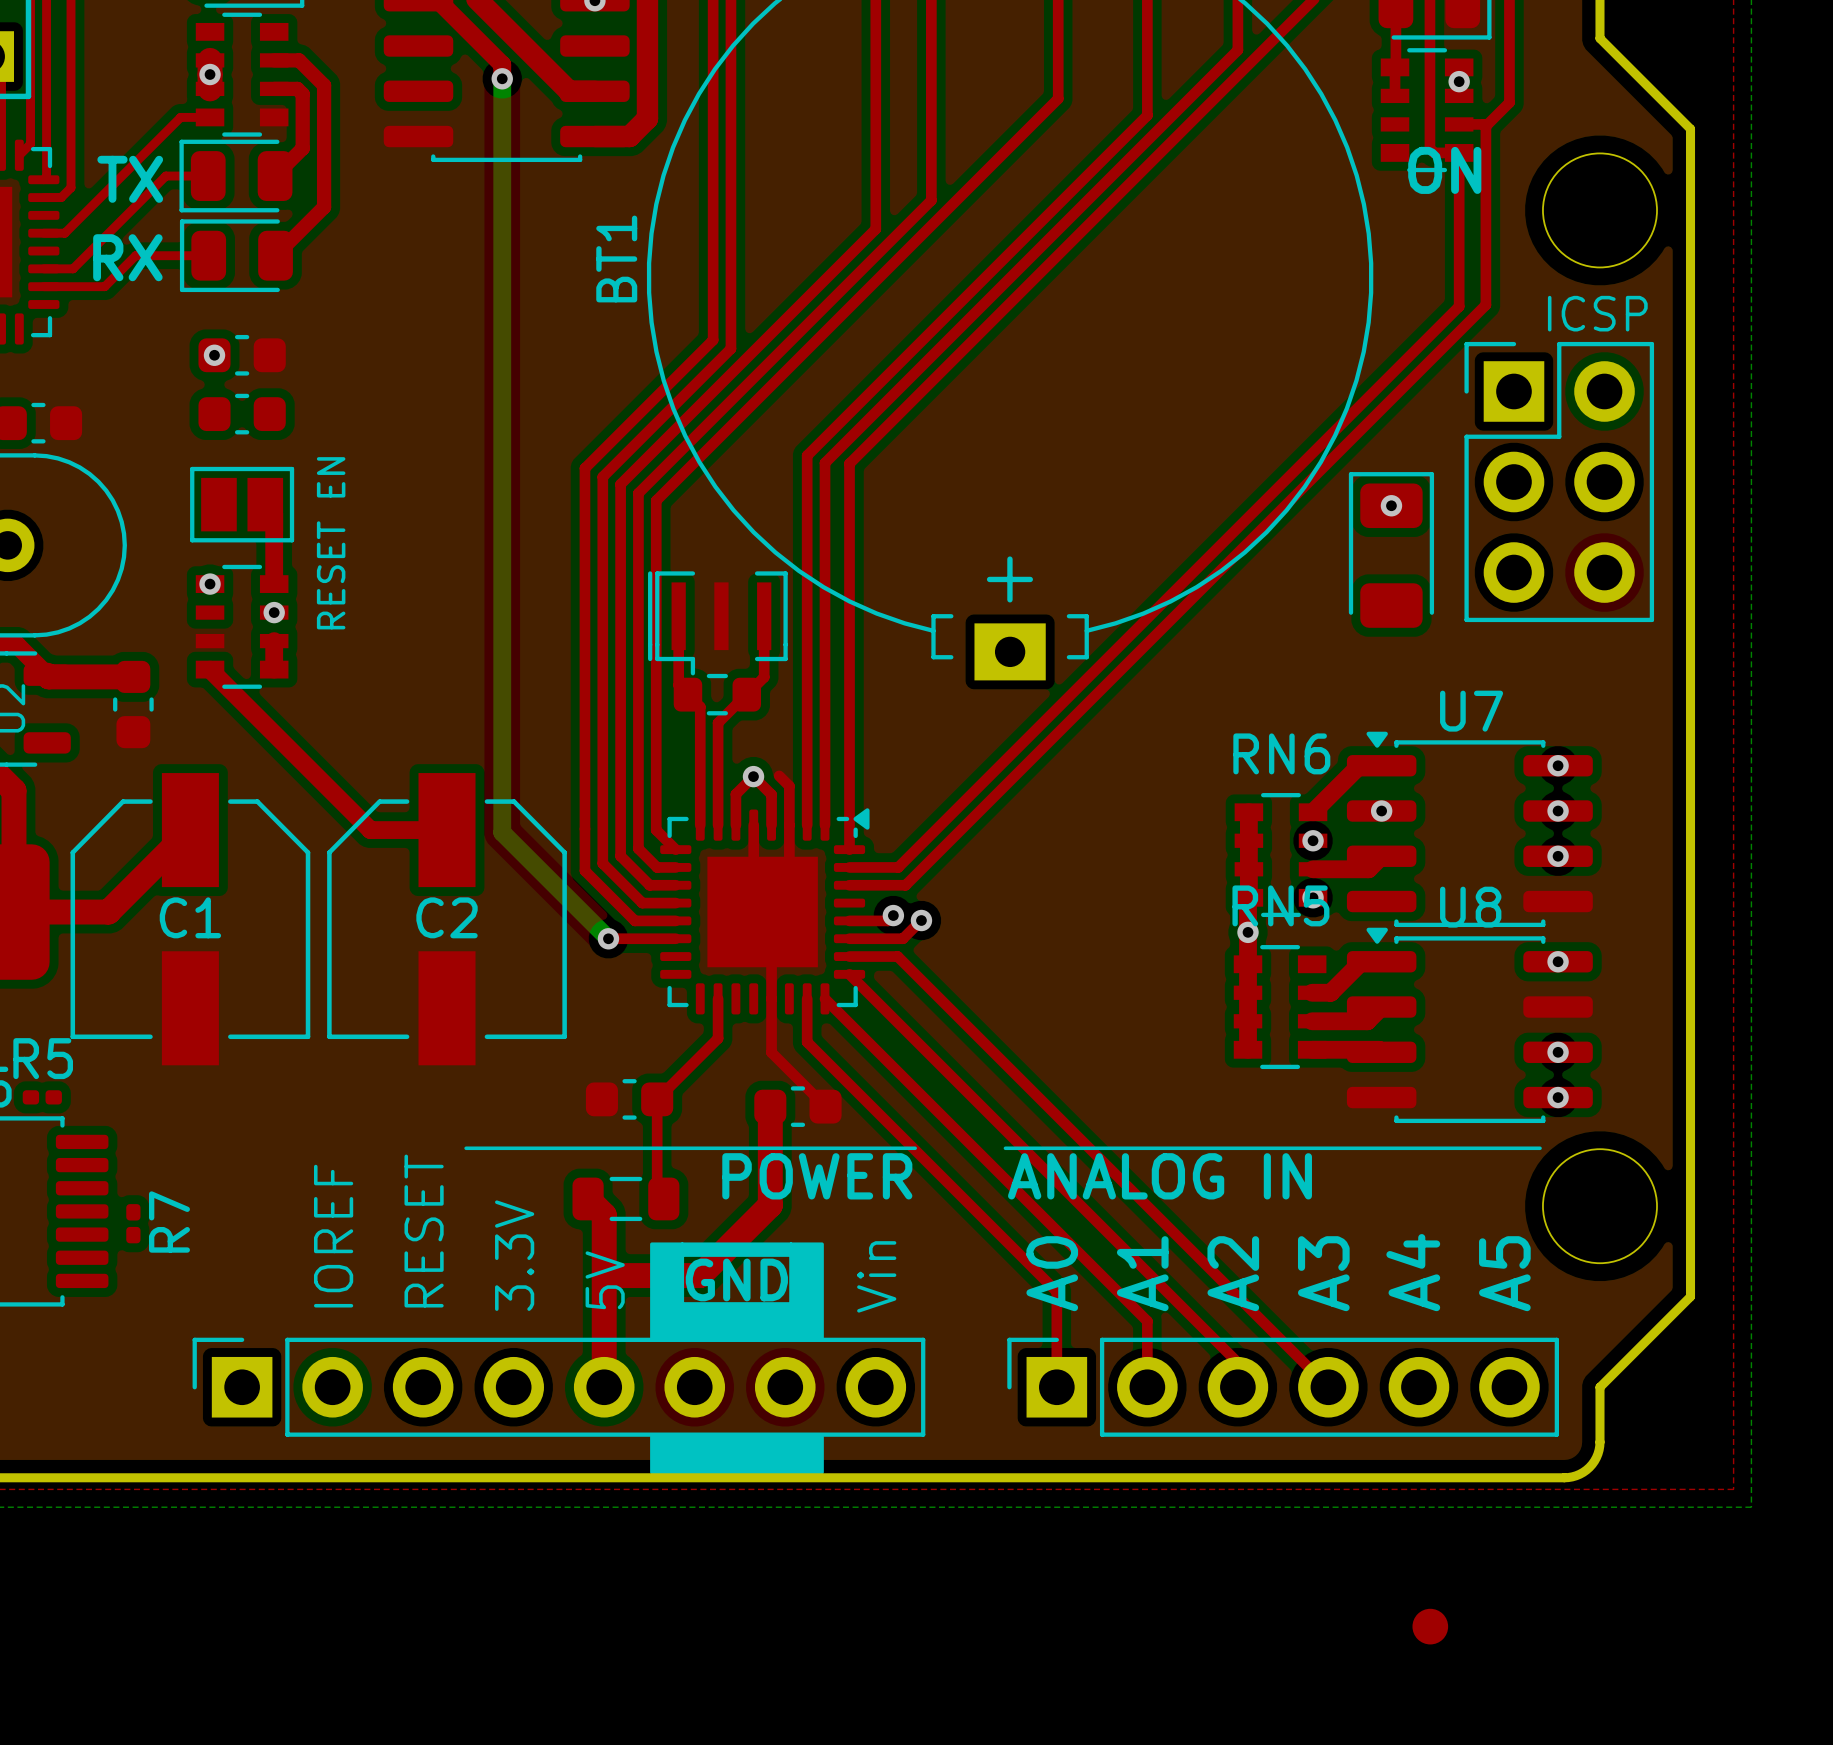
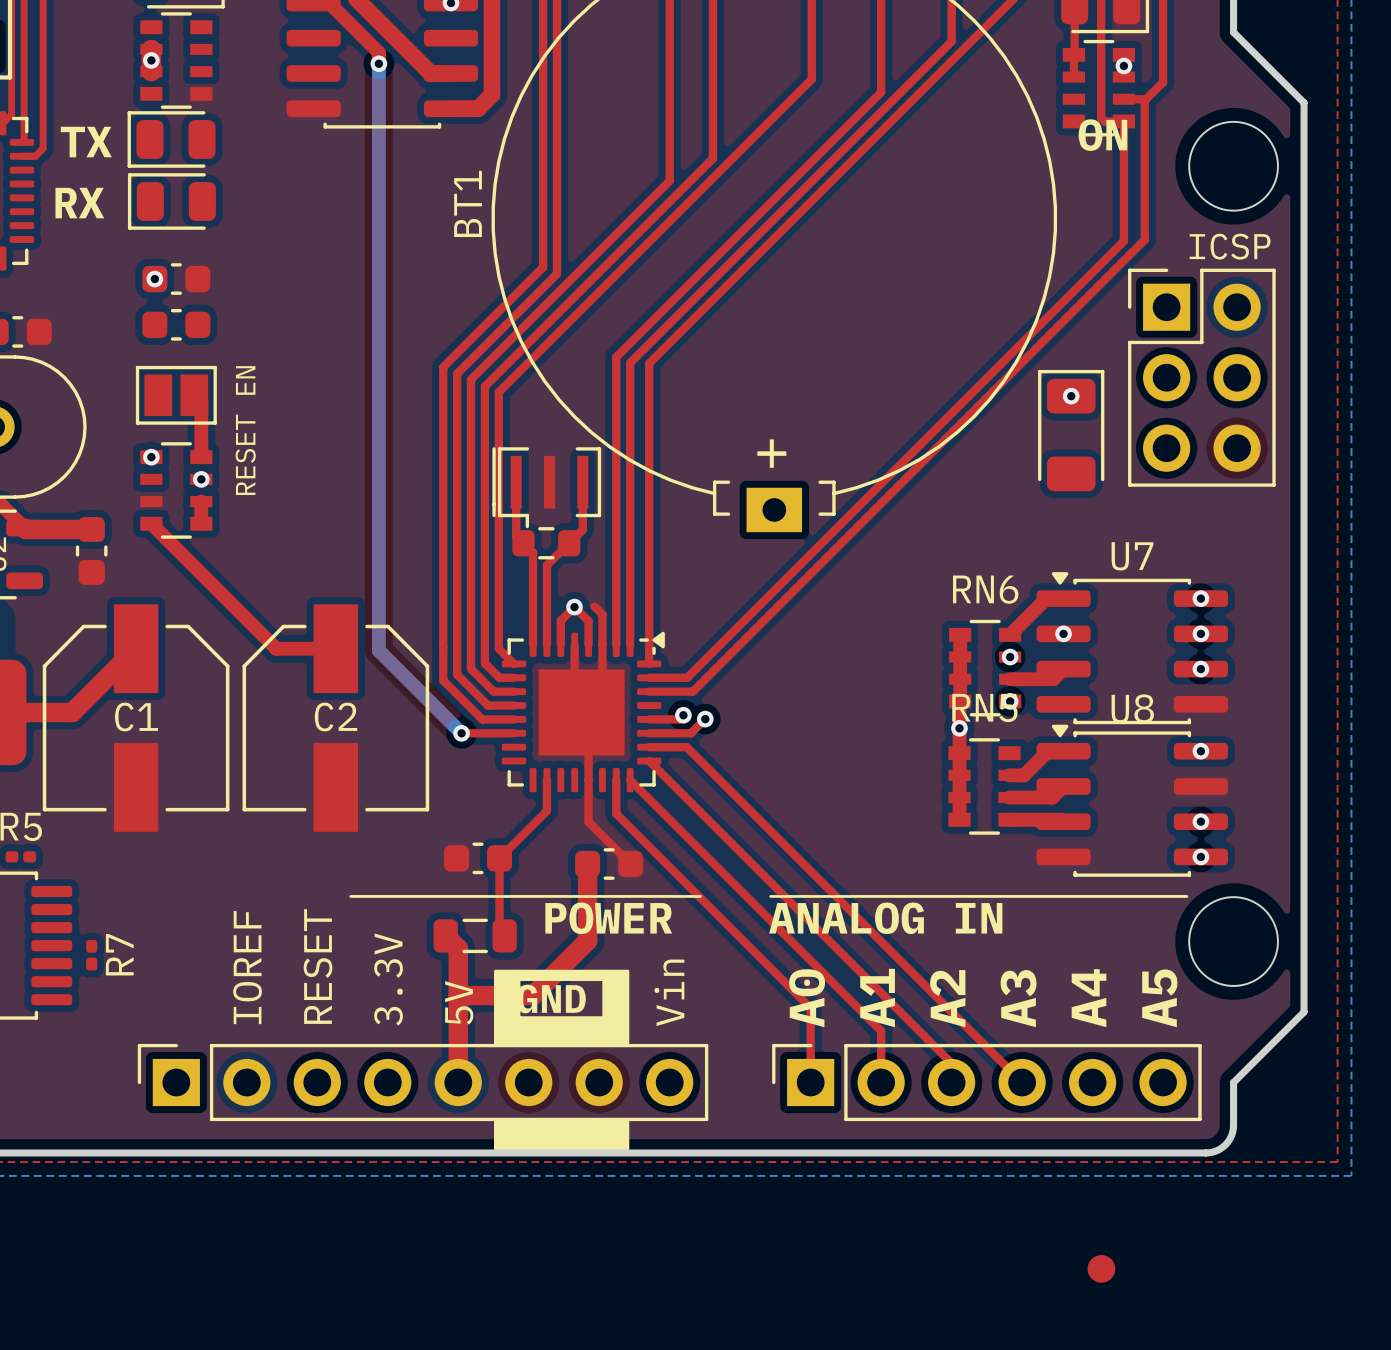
top track: (274, 60) (299, 60) (324, 85) (324, 207) (275, 255) -> none
top track: (274, 88) (297, 88) (302, 94) (302, 148) (275, 176) -> none
top track: (210, 117) (180, 117) (64, 233) (43, 233) -> none
top track: (208, 176) (165, 176) (73, 268) (43, 268) -> none
top track: (208, 255) (135, 255) (104, 286) (43, 286) -> none

